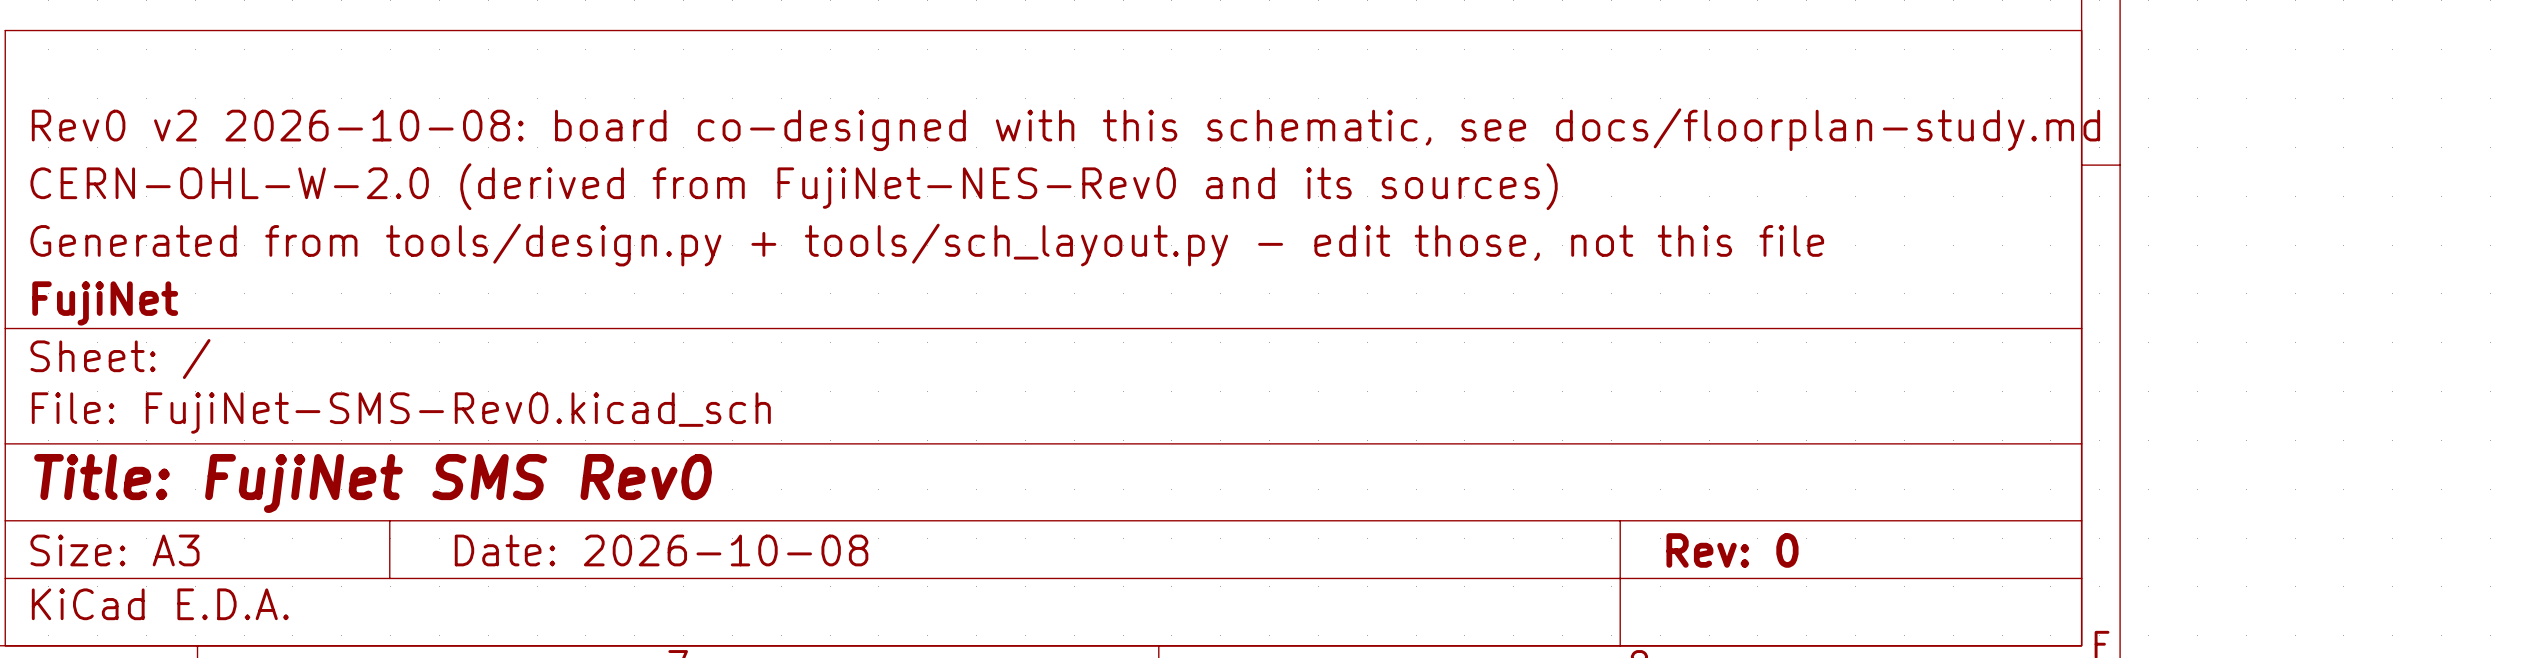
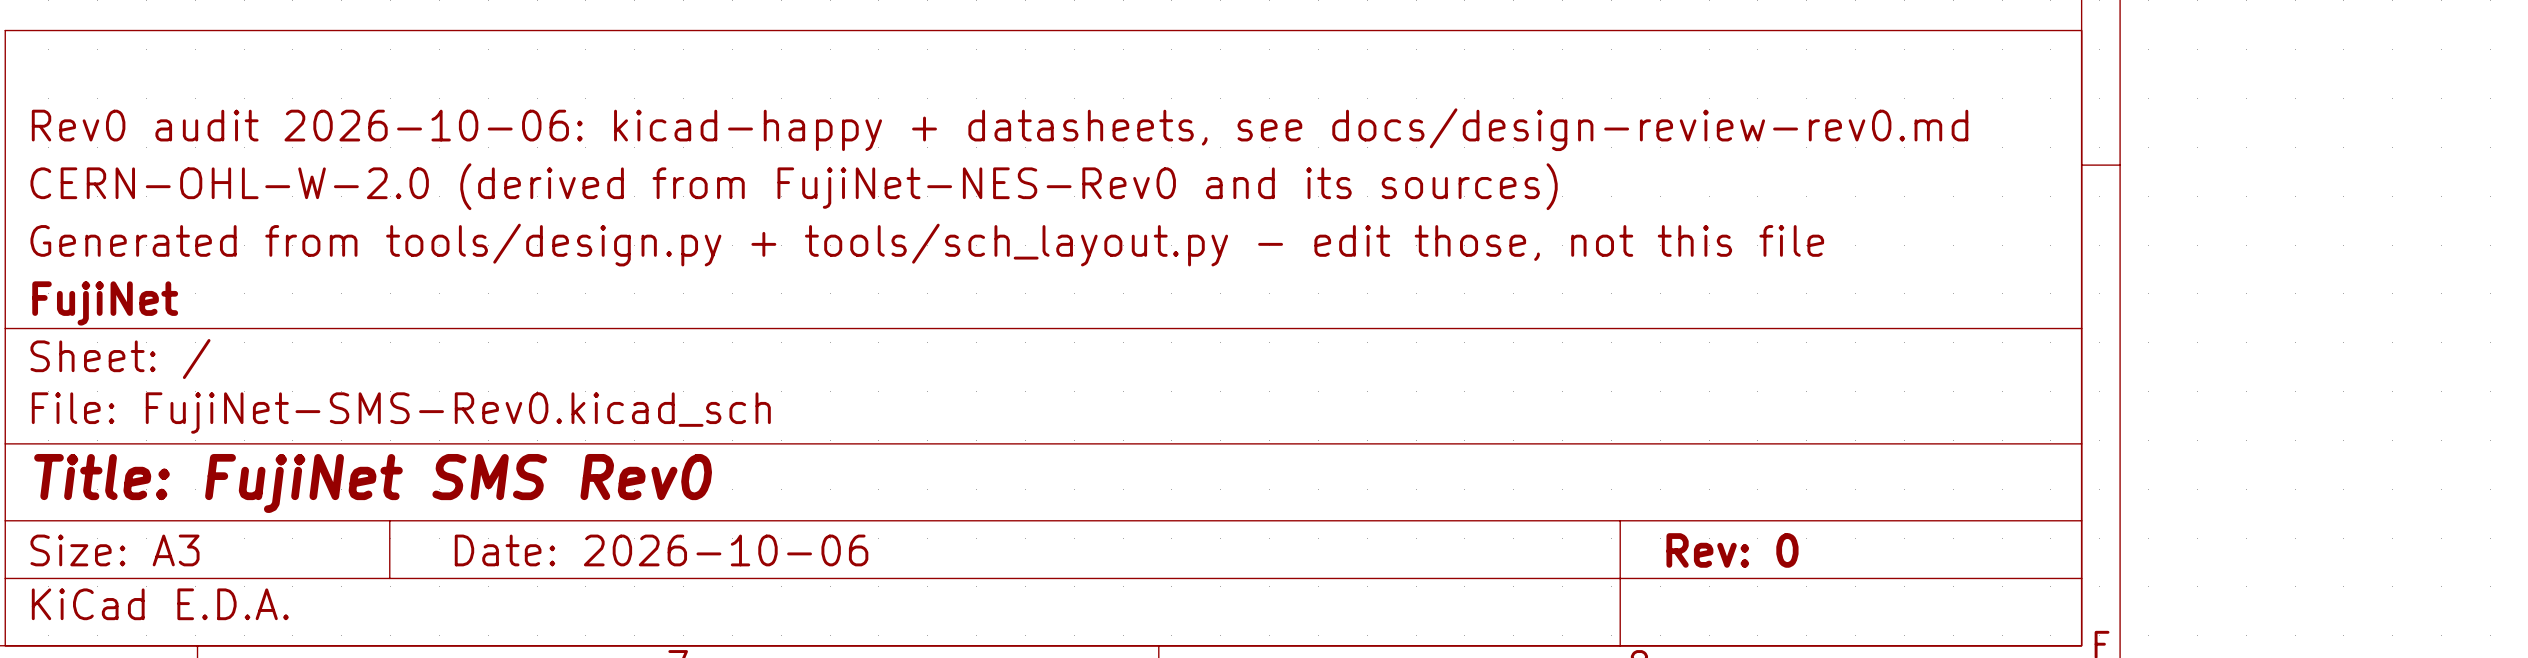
title block: Rev0 v2 2026-10-08: board co-designed with this schematic, see docs/floorplan-study.md (1065, 129) -> Rev0 audit 2026-10-06: kicad-happy + datasheets, see docs/design-review-rev0.md (1000, 129)
title block: Date: 2026-10-08 (661, 550) -> Date: 2026-10-06 (661, 550)

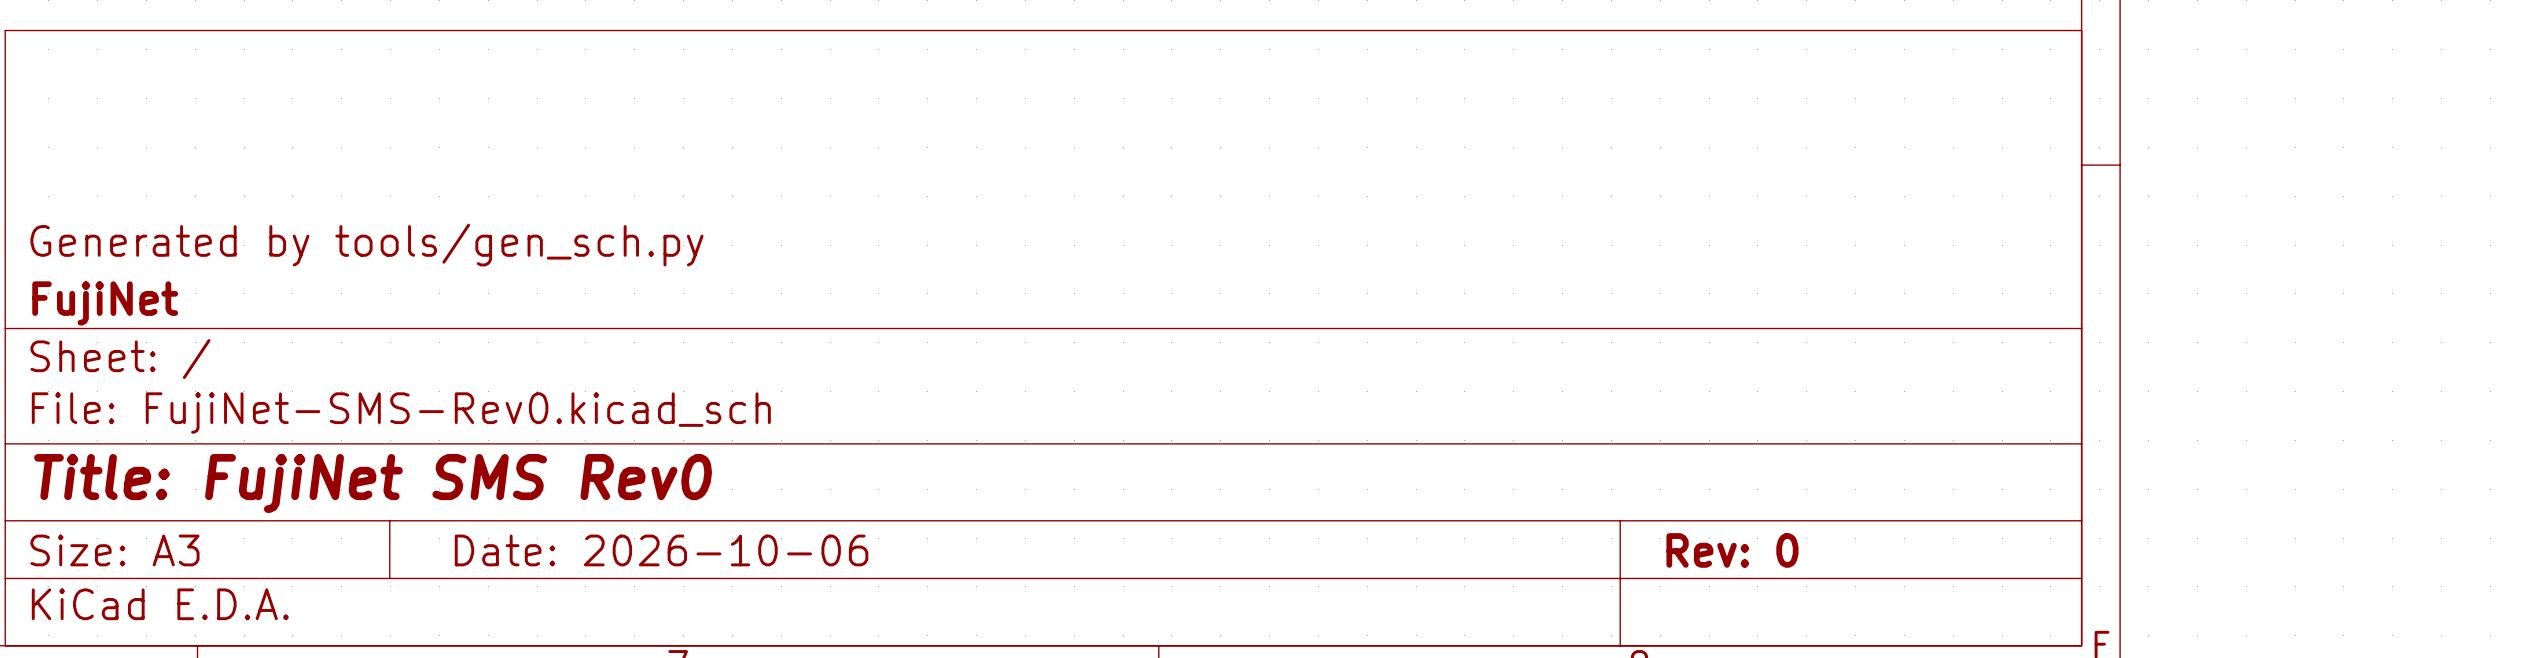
title block: Rev0 audit 2026-10-06: kicad-happy + datasheets, see docs/design-review-rev0.md (1000, 129) -> none
title block: CERN-OHL-W-2.0 (derived from FujiNet-NES-Rev0 and its sources) (794, 186) -> none
title block: Generated from tools/design.py + tools/sch_layout.py - edit those, not this file (927, 245) -> Generated by tools/gen_sch.py (366, 245)

